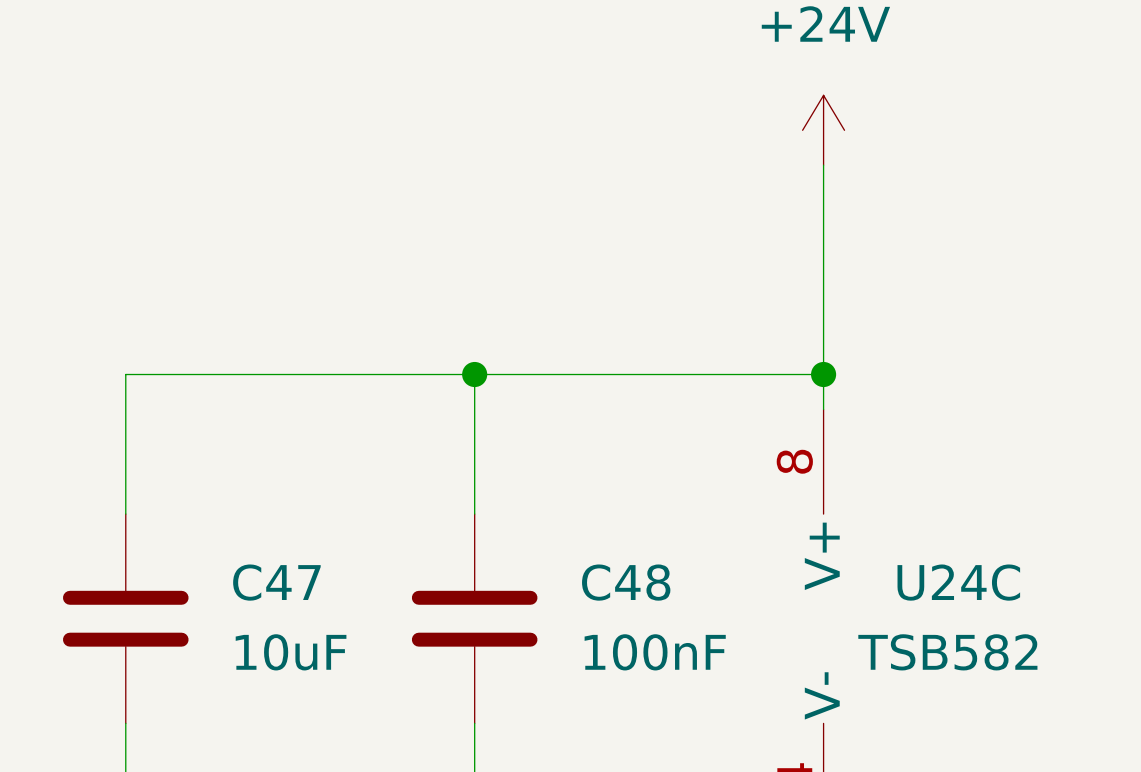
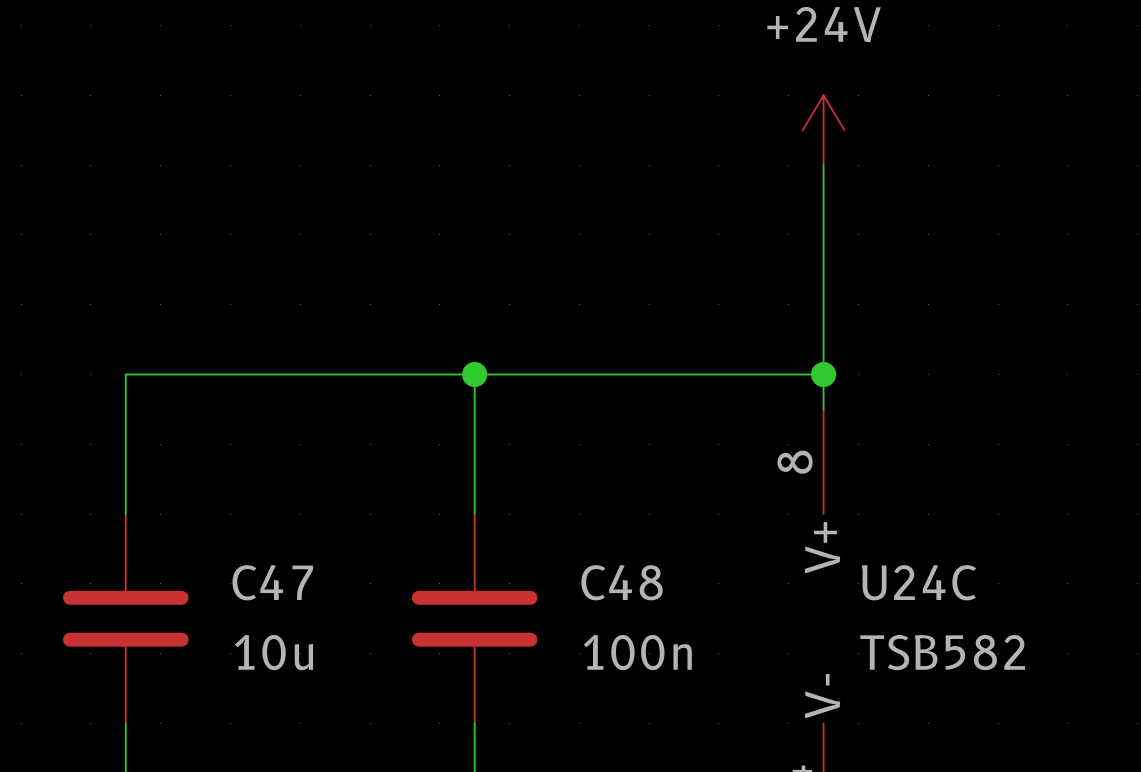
U24C name position: U24C (958, 582) -> U24C (918, 582)
C47 value: 10uF (291, 652) -> 10u (274, 652)
C48 value: 100nF (655, 652) -> 100n (637, 652)

